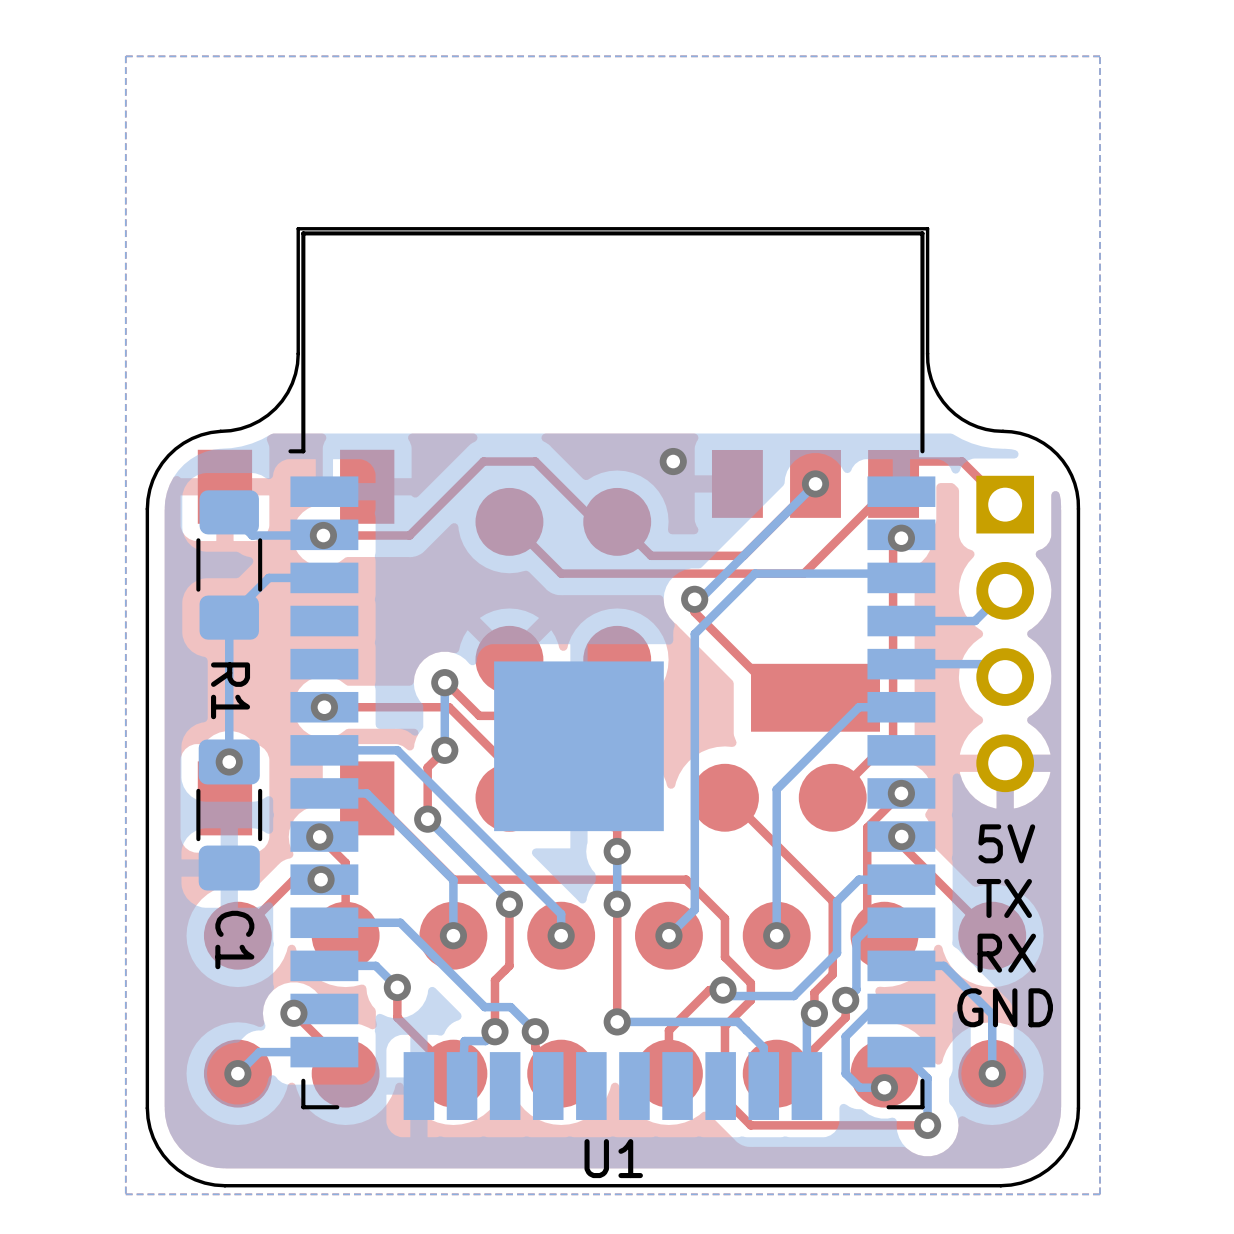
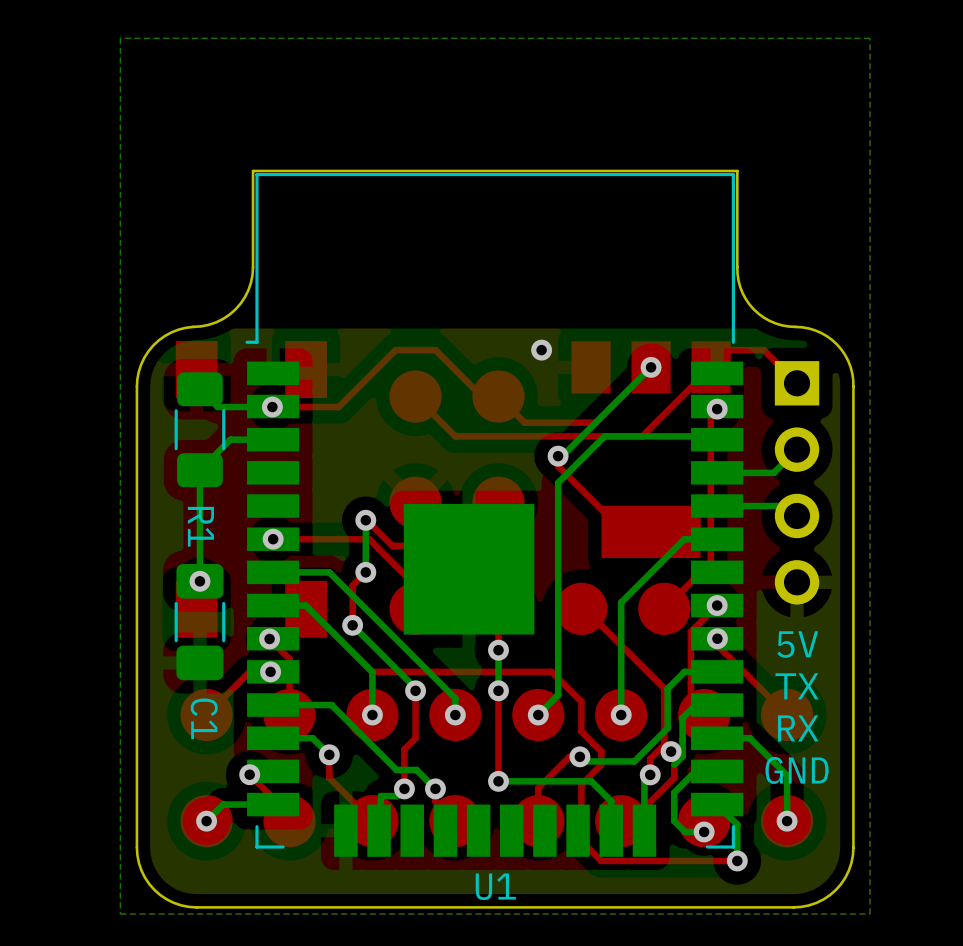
via position: (845, 1000) -> (671, 751)

